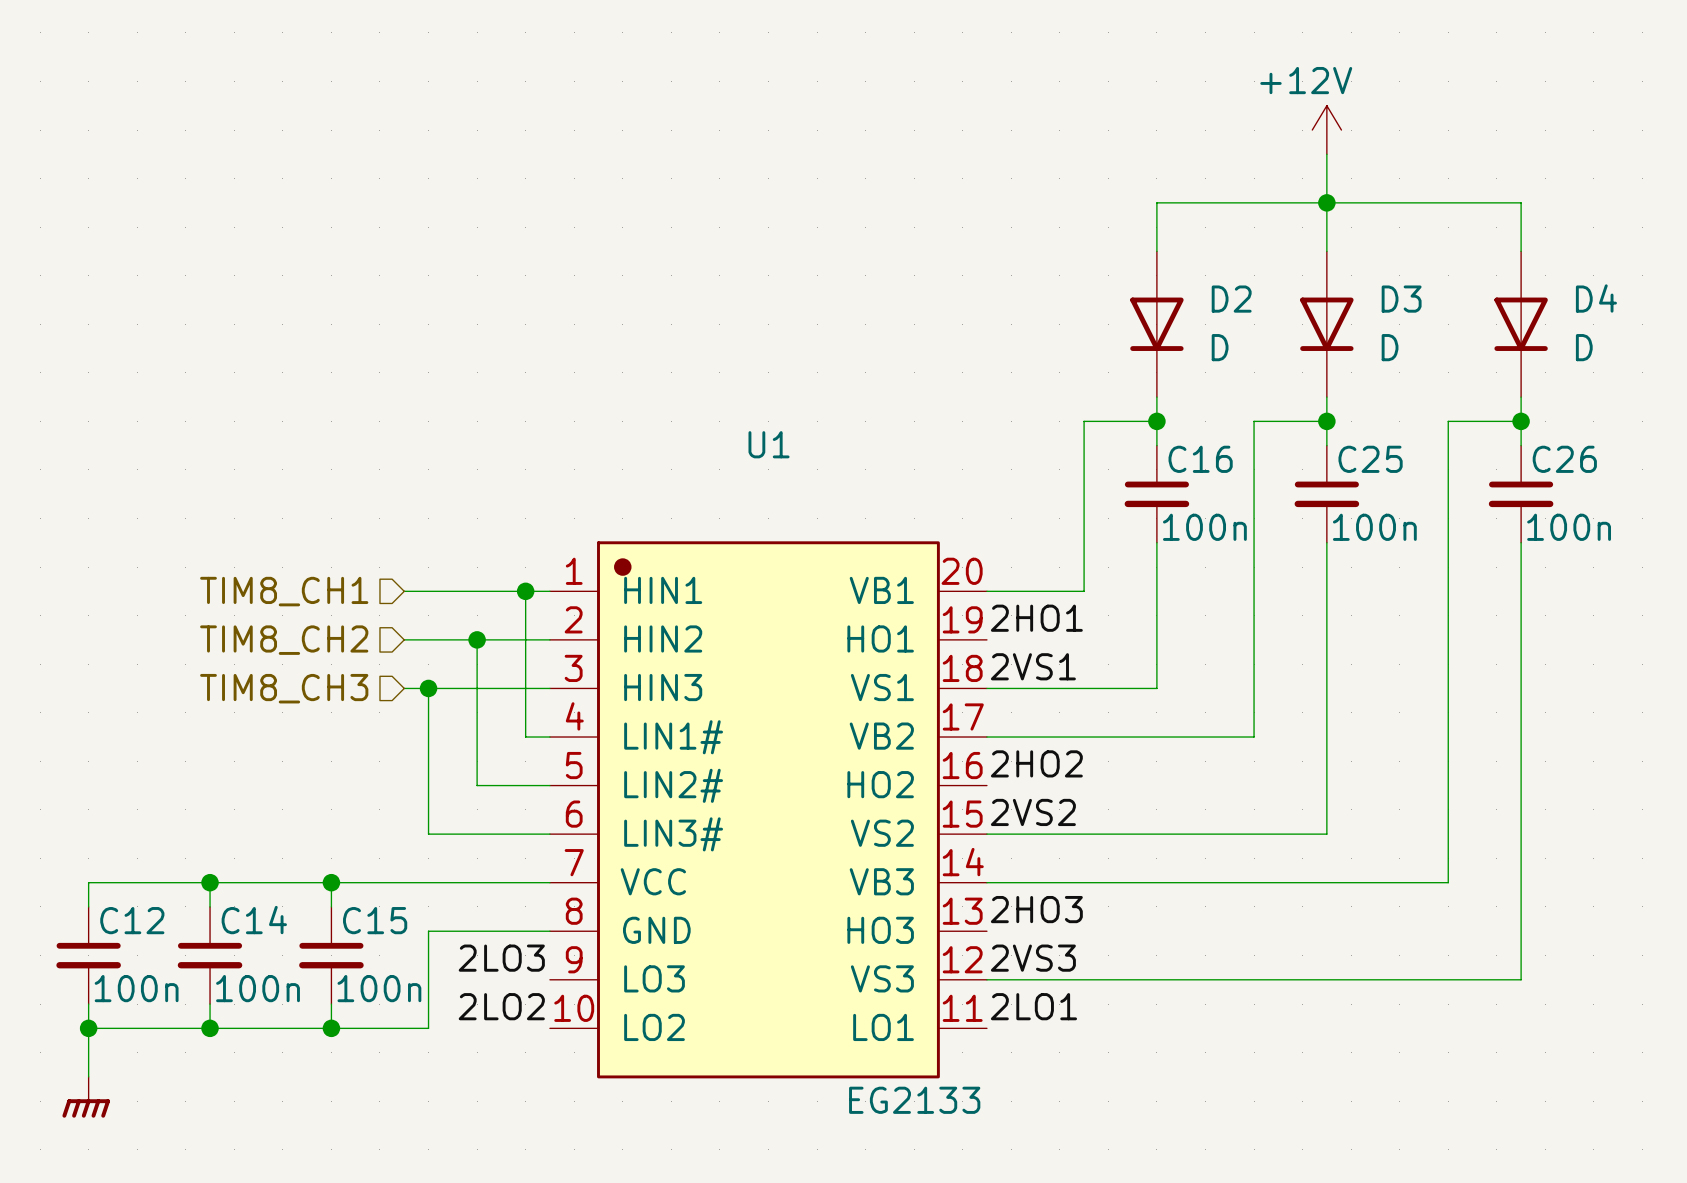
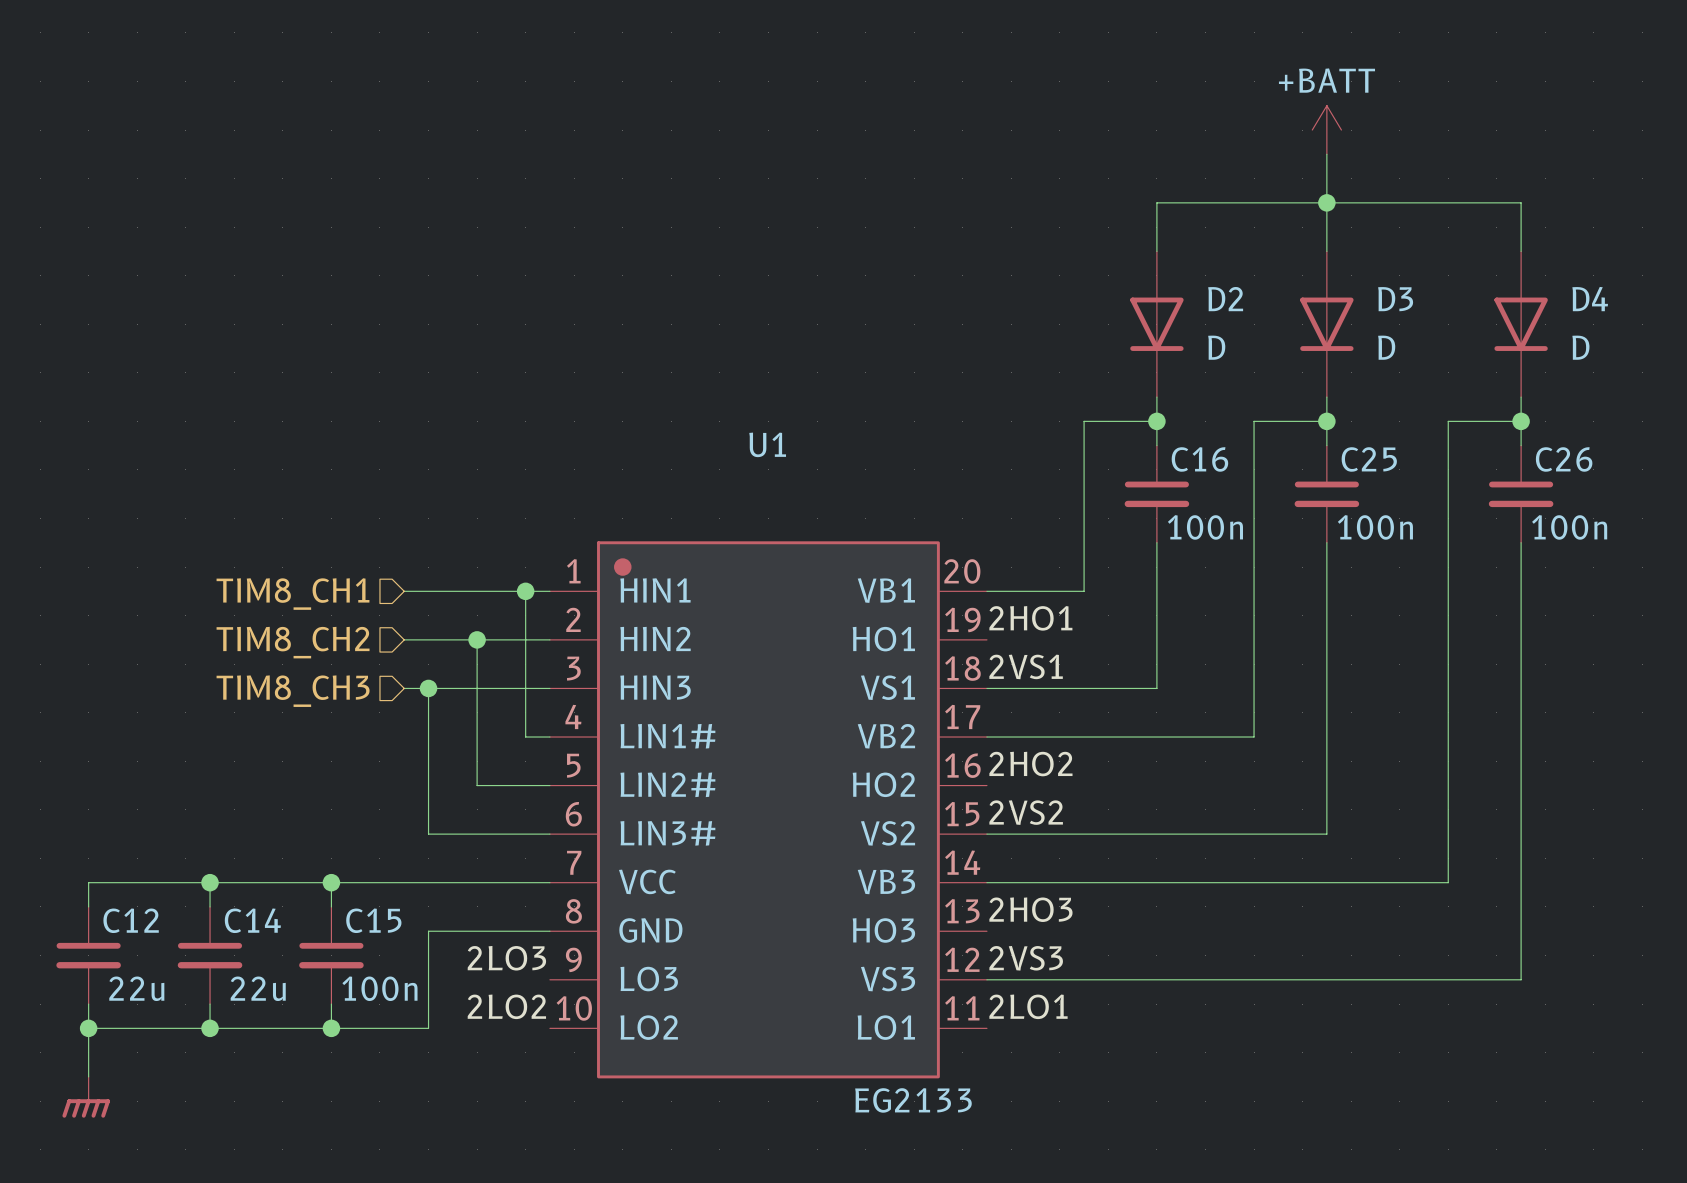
power symbol: +12V (1326, 130) -> +BATT (1326, 130)
C12 value: 100n (136, 988) -> 22u (136, 988)
C14 value: 100n (258, 988) -> 22u (258, 988)

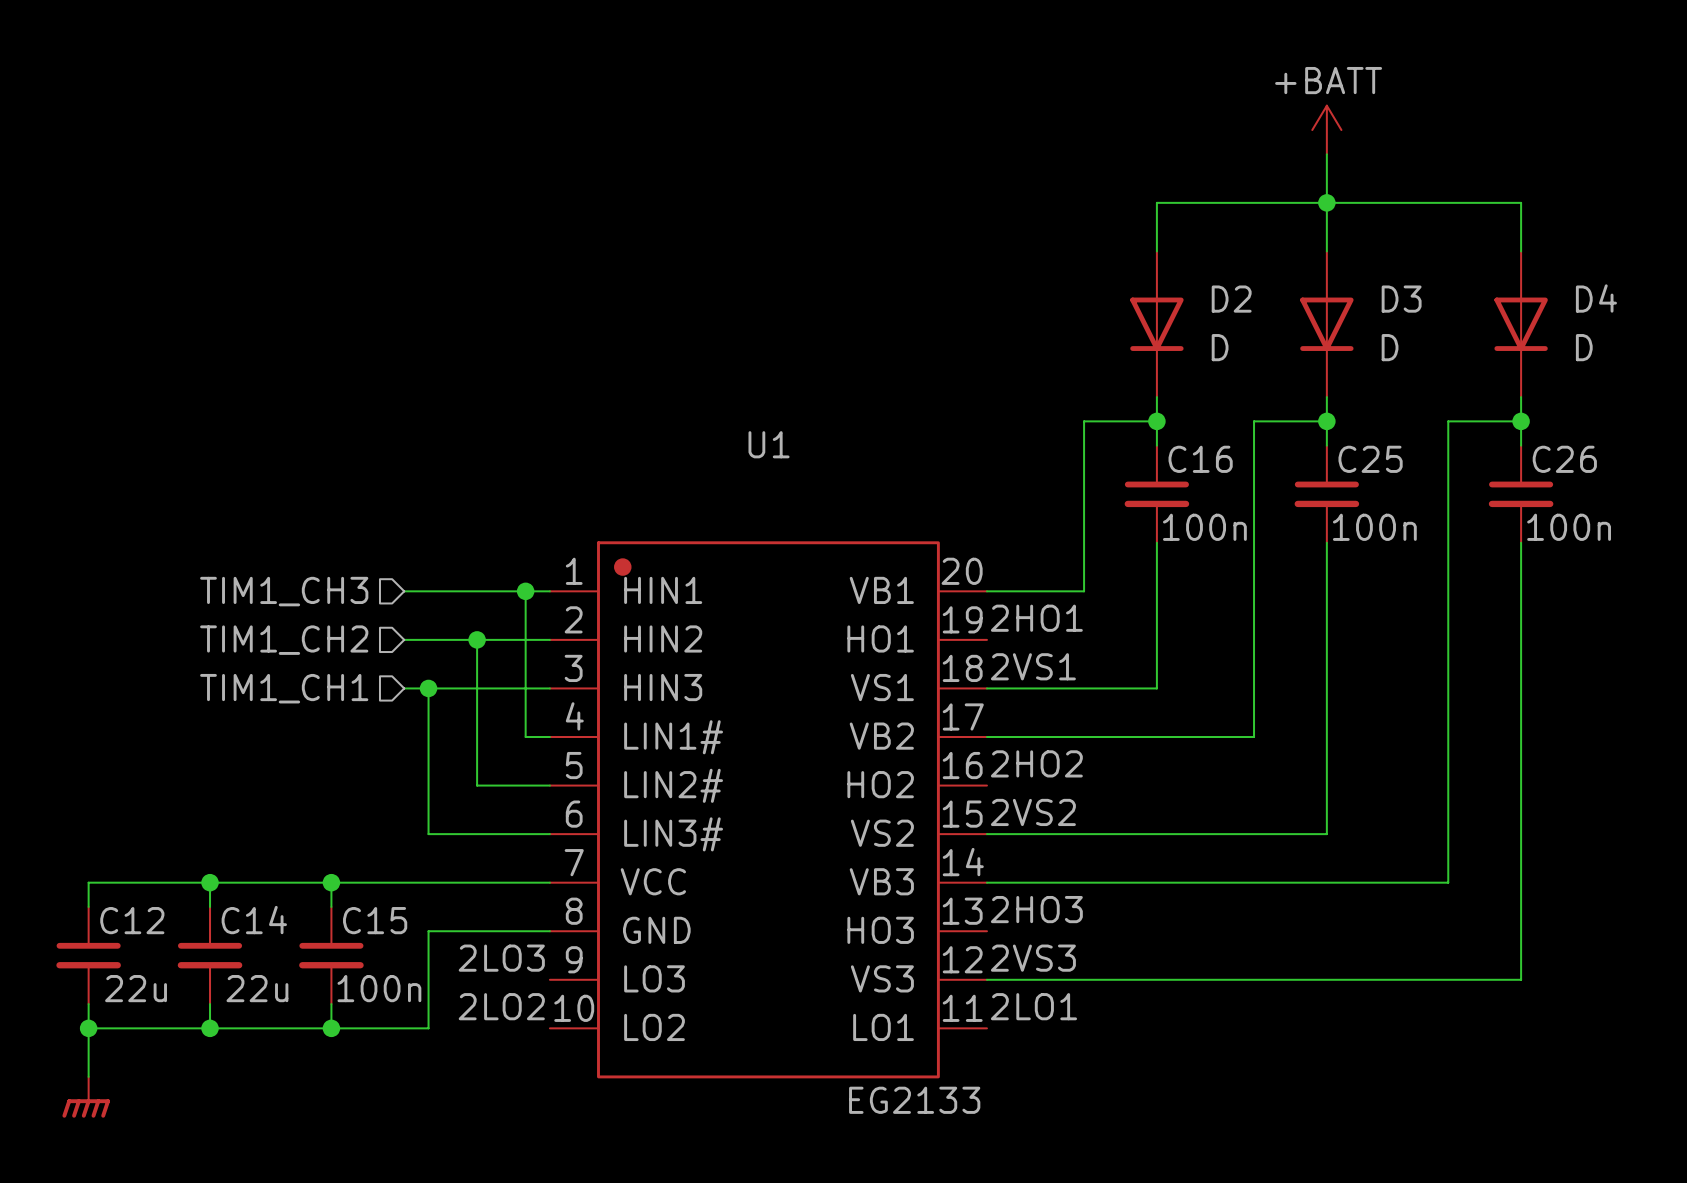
hierarchical label: TIM8_CH1 (293, 594) -> TIM1_CH3 (284, 591)
hierarchical label: TIM8_CH2 (293, 642) -> TIM1_CH2 (284, 640)
hierarchical label: TIM8_CH3 (293, 691) -> TIM1_CH1 (284, 688)

